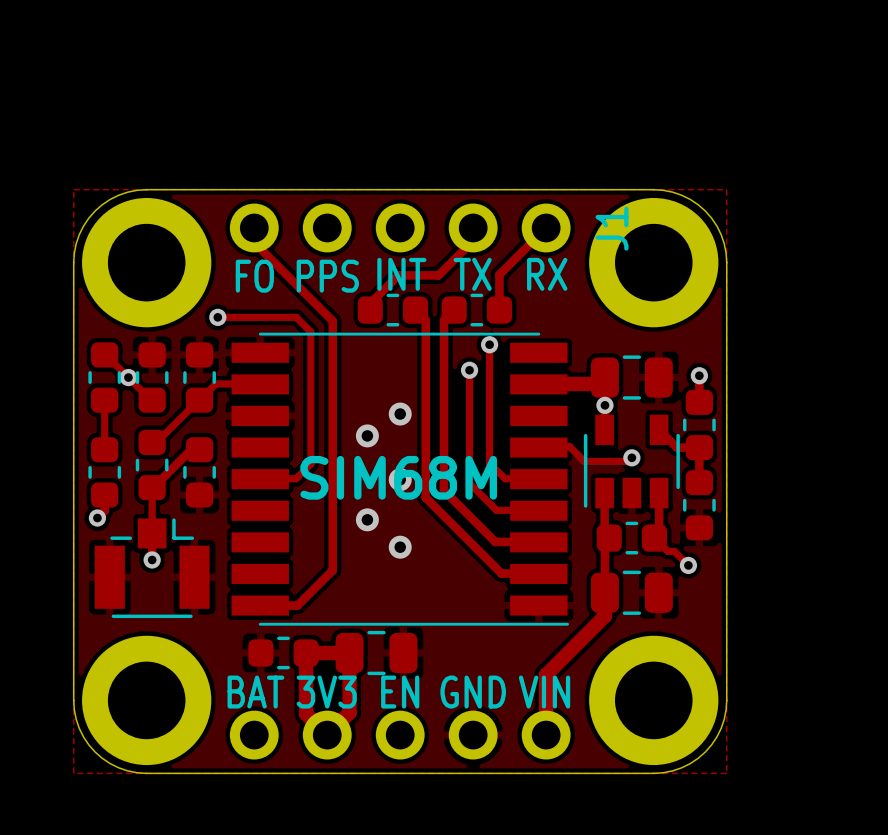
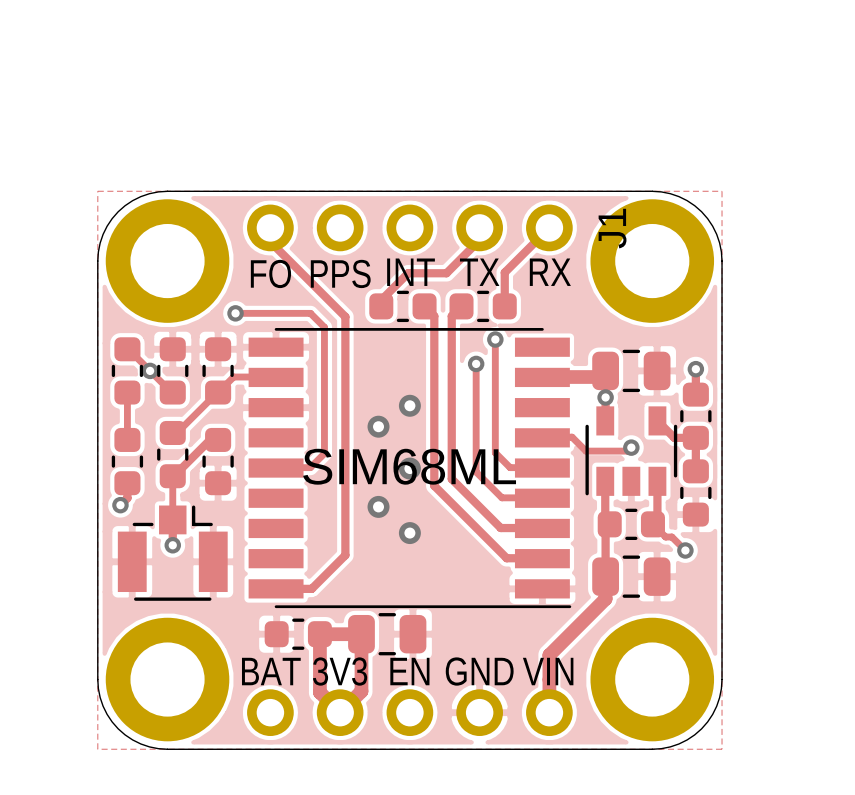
part value: SIM68M (398, 477) -> SIM68ML (409, 466)

